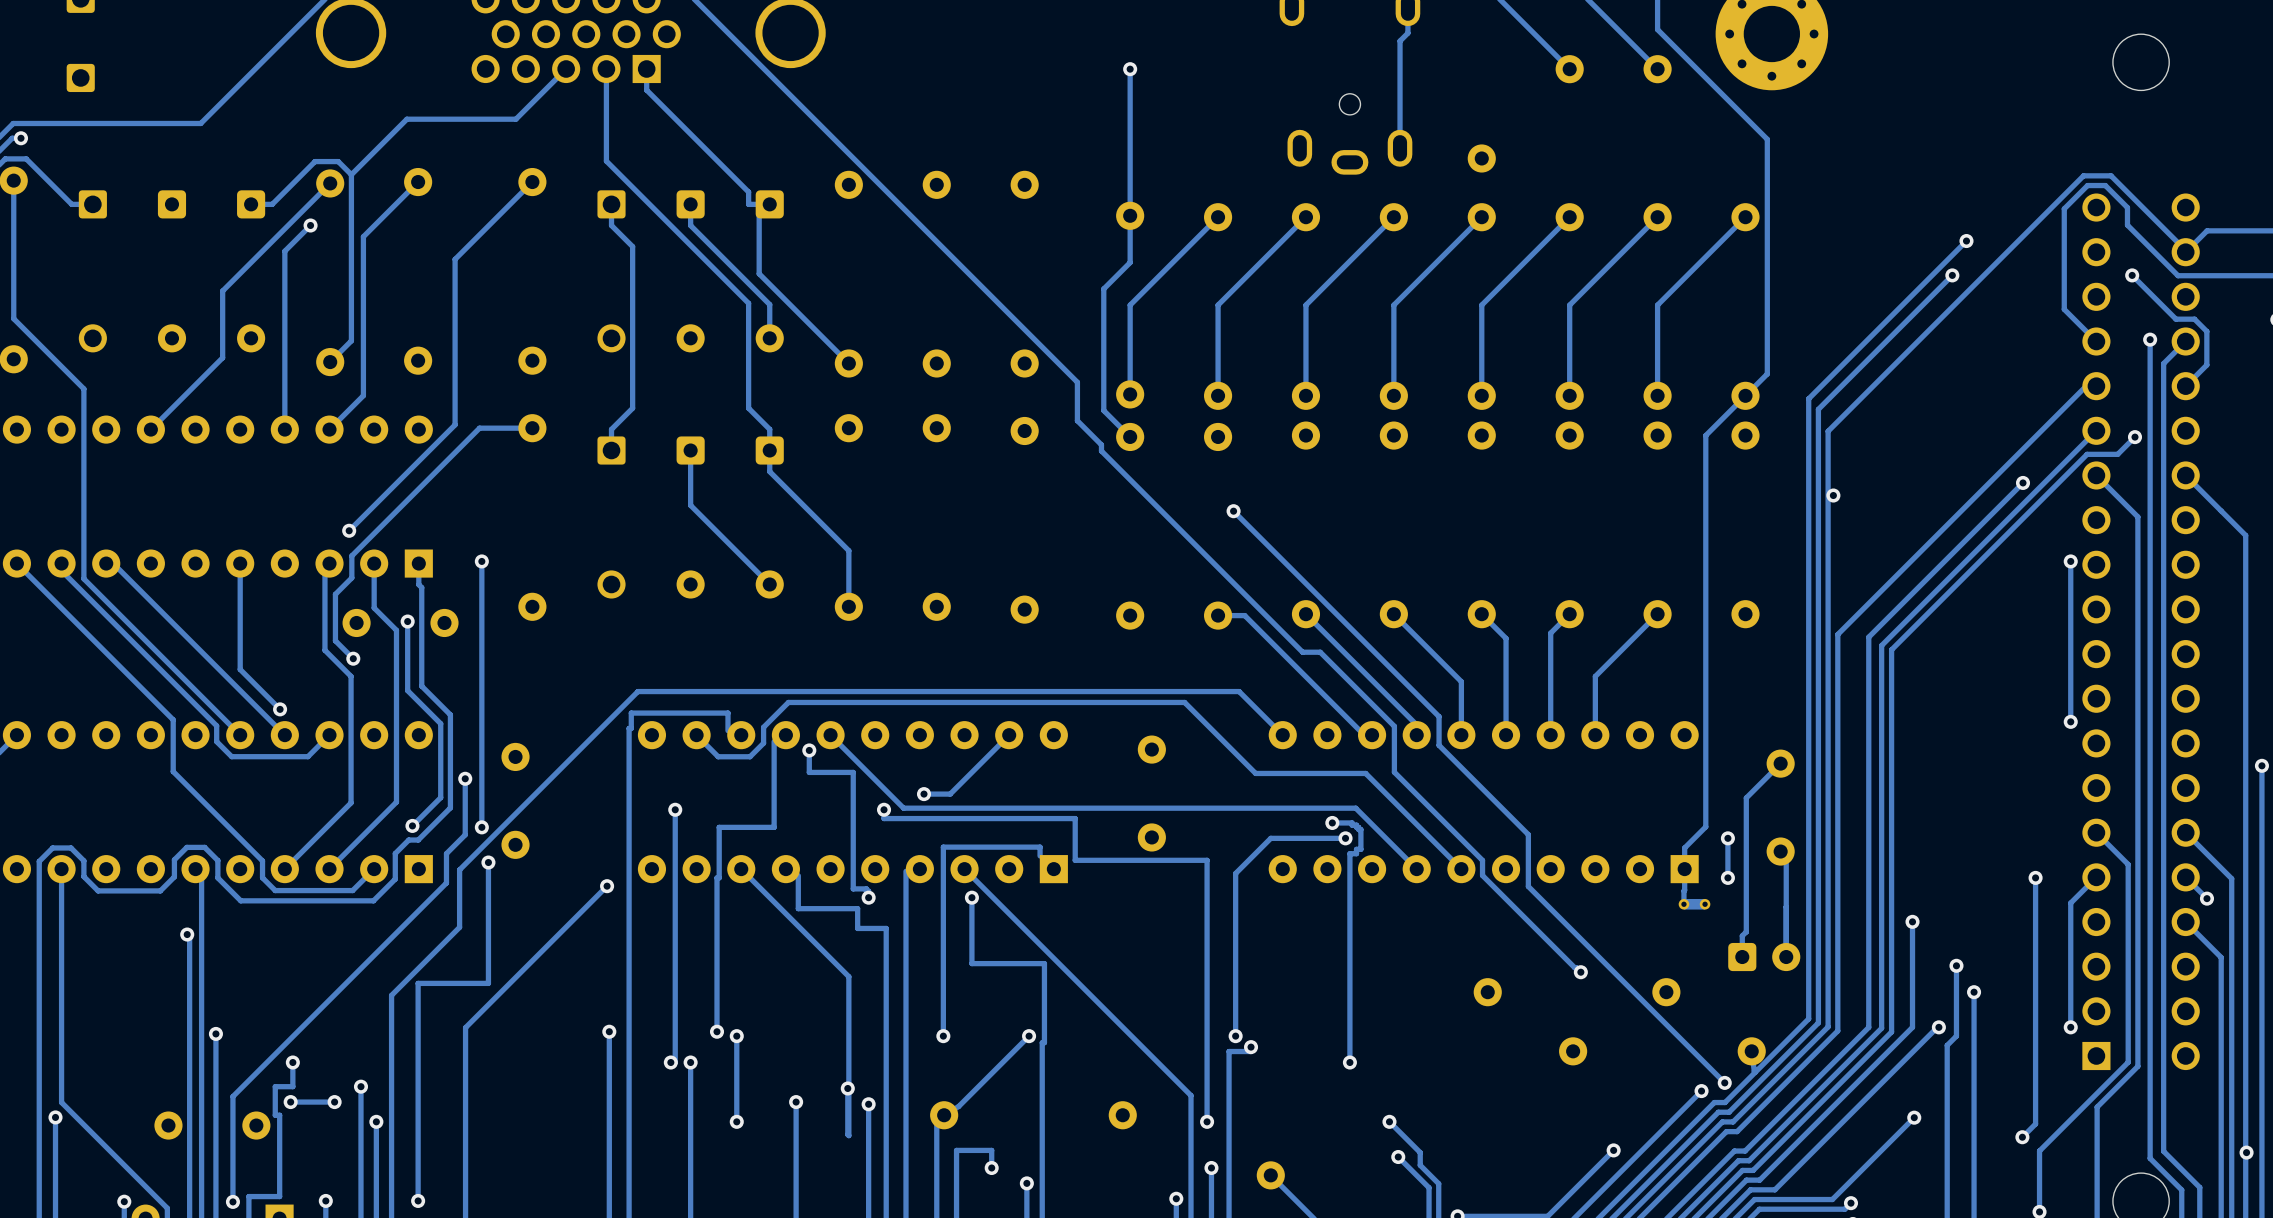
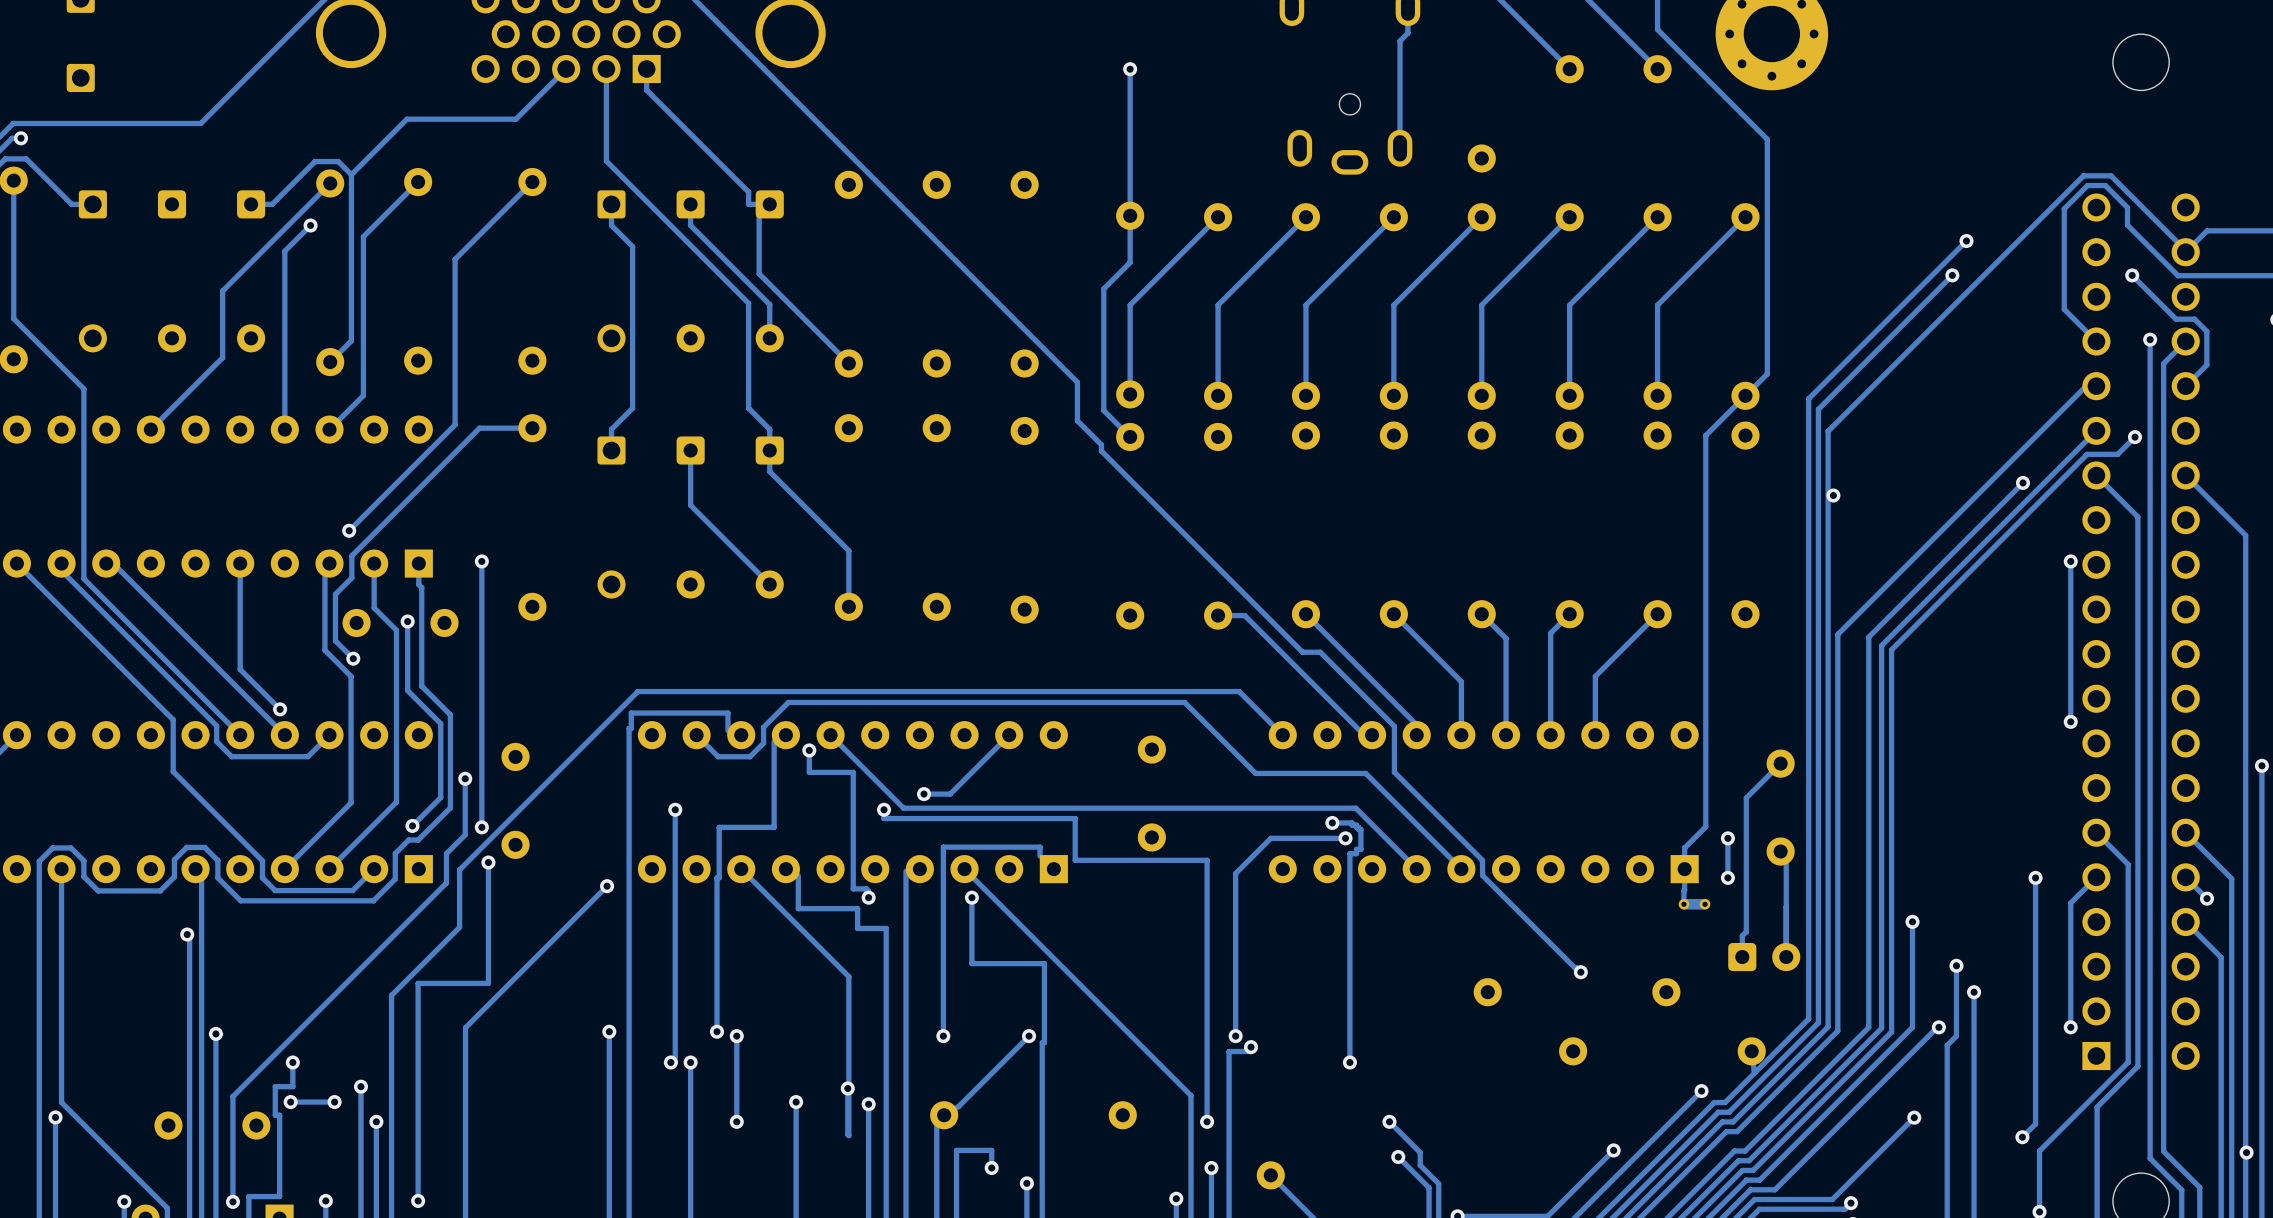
track: (1233, 511) (1439, 716) (1439, 745) (1528, 834) (1528, 886) (1724, 1082) -> none
via: (1233, 511) -> none
via: (1724, 1082) -> none

